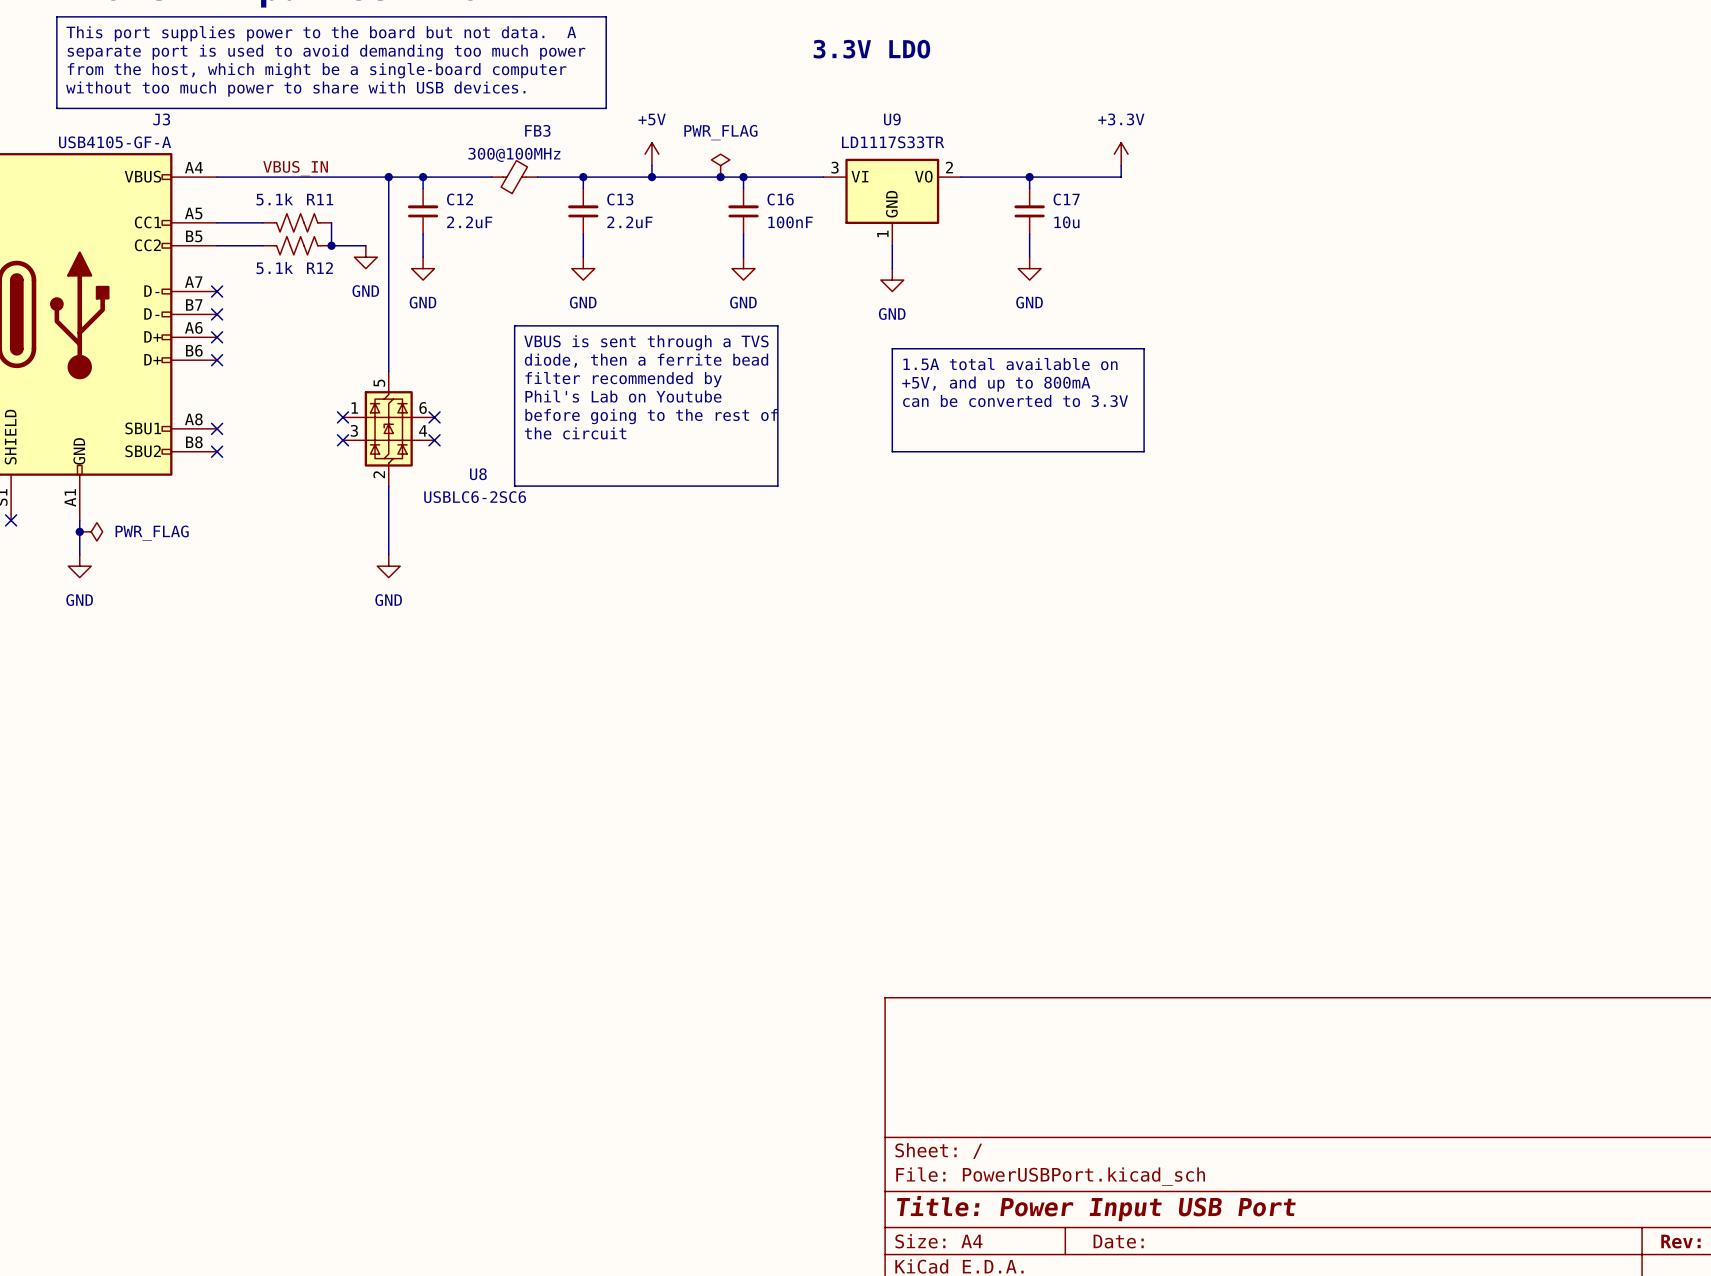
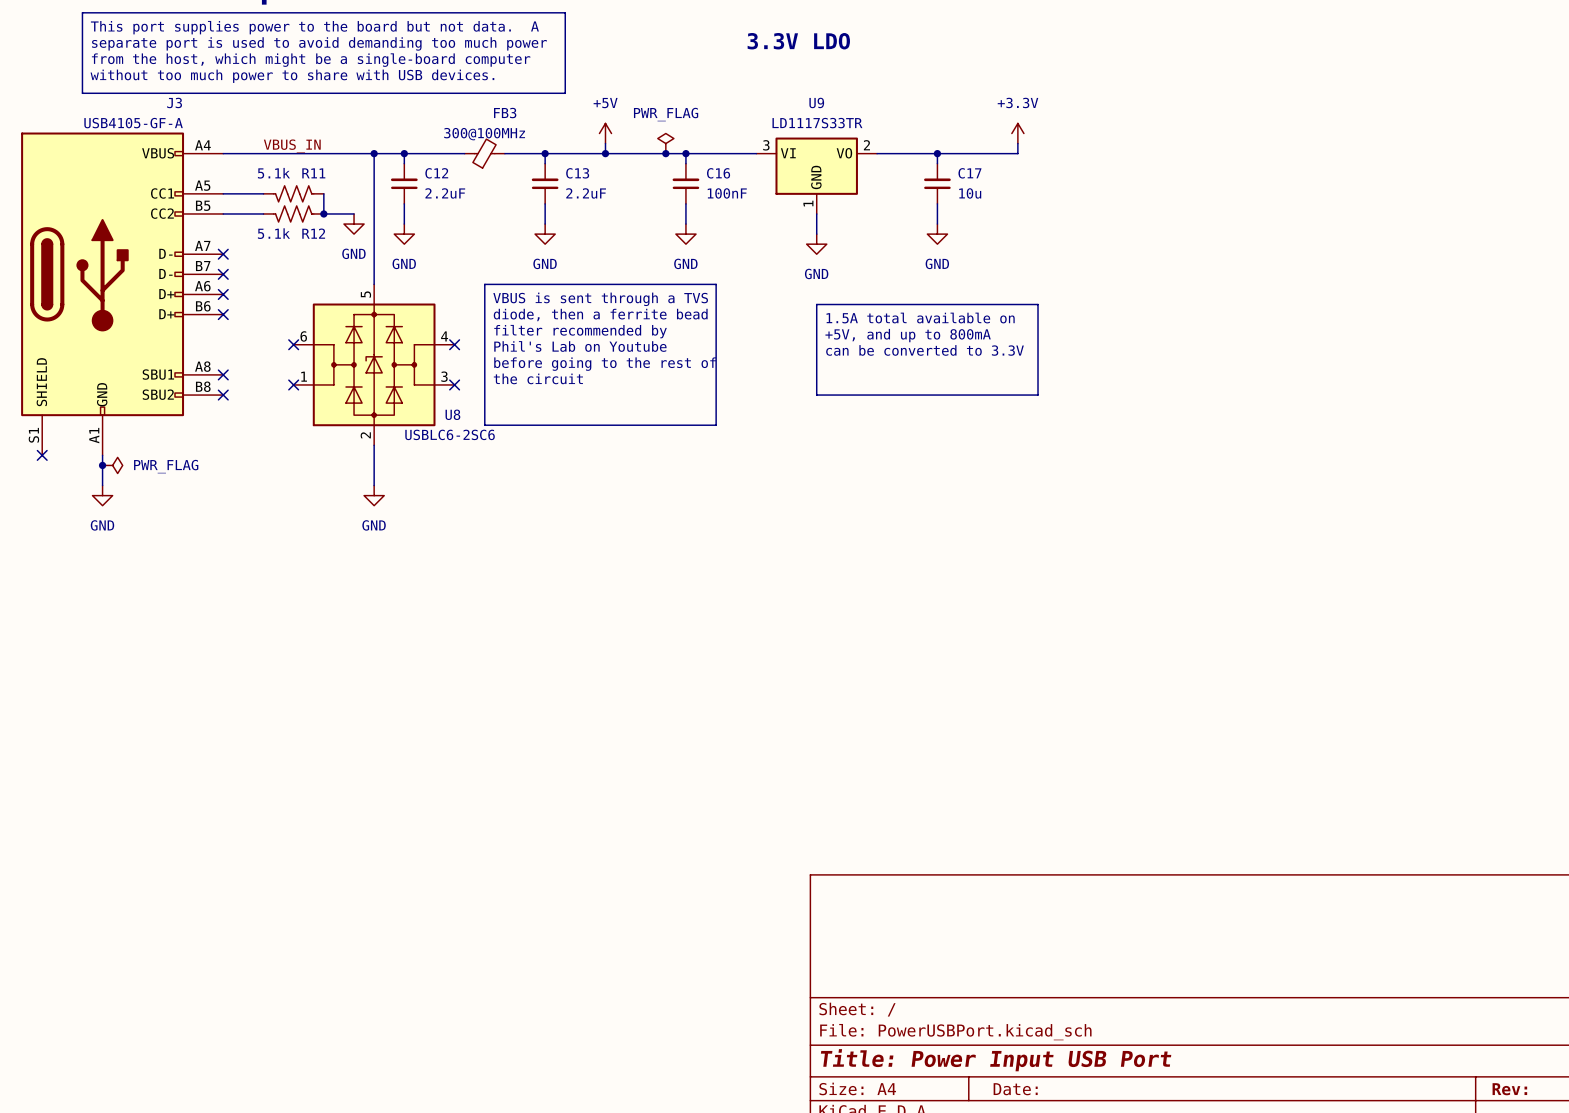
U8 symbol: [342, 371, 435, 487] -> [293, 284, 455, 446]
no-connect mark: none -> (293, 344)
no-connect mark: none -> (454, 344)
no-connect mark: (342, 417) -> none
no-connect mark: (434, 417) -> none
no-connect mark: none -> (293, 384)
no-connect mark: (342, 440) -> none
no-connect mark: (434, 440) -> none
no-connect mark: none -> (454, 384)

